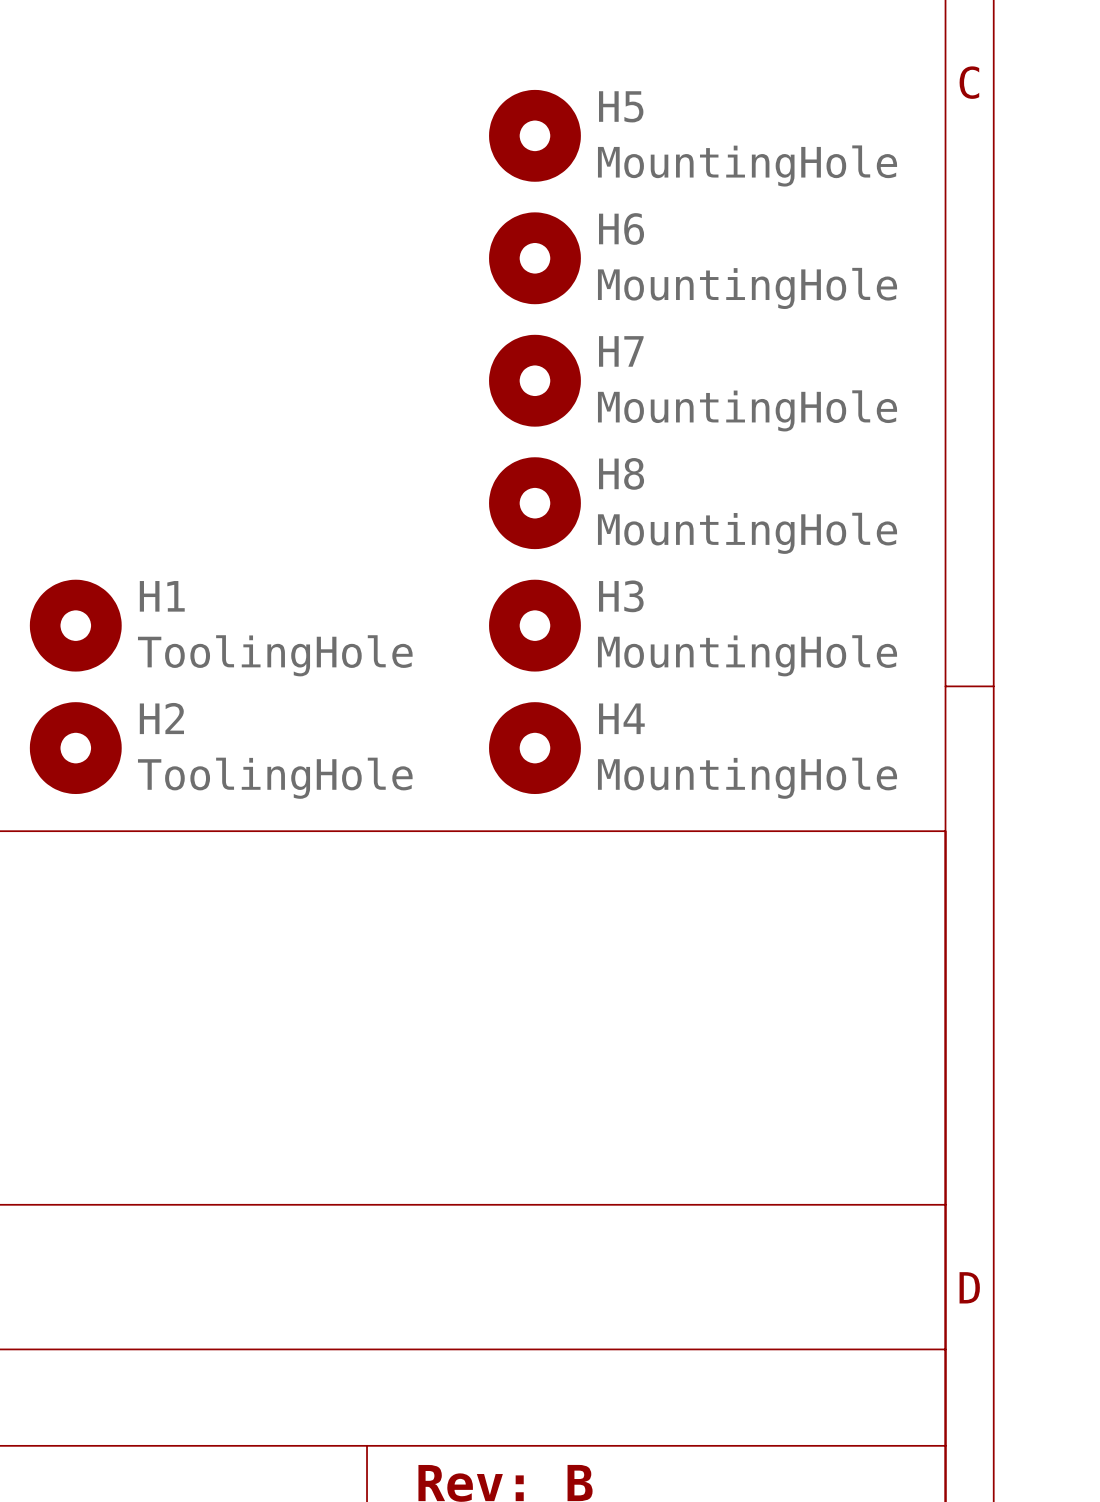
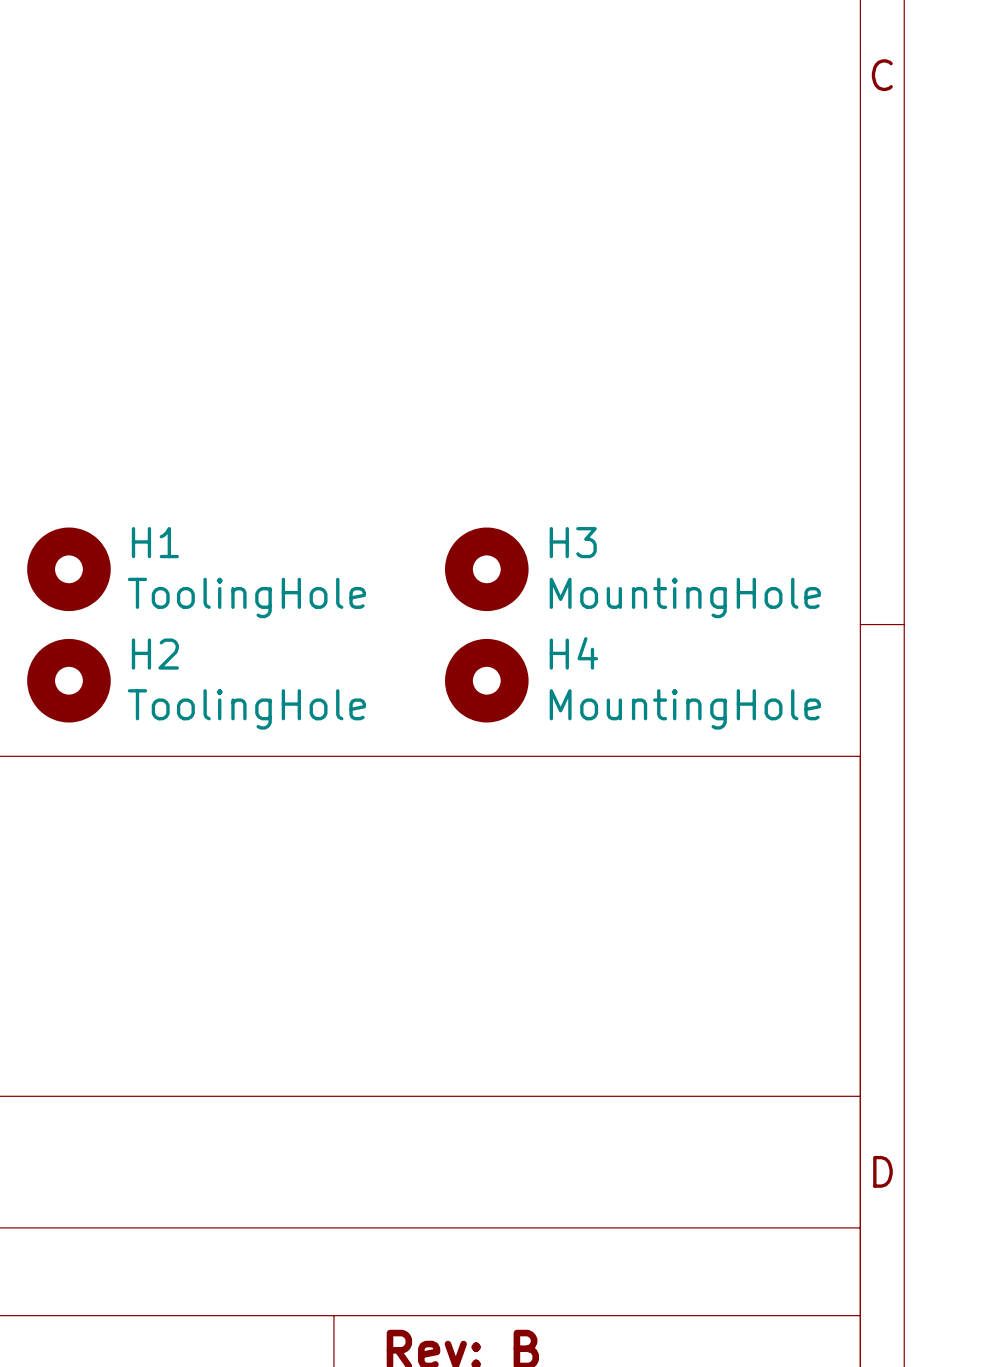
H5: MountingHole (534, 135) -> none
H6: MountingHole (534, 258) -> none
H7: MountingHole (534, 380) -> none
H8: MountingHole (534, 503) -> none

